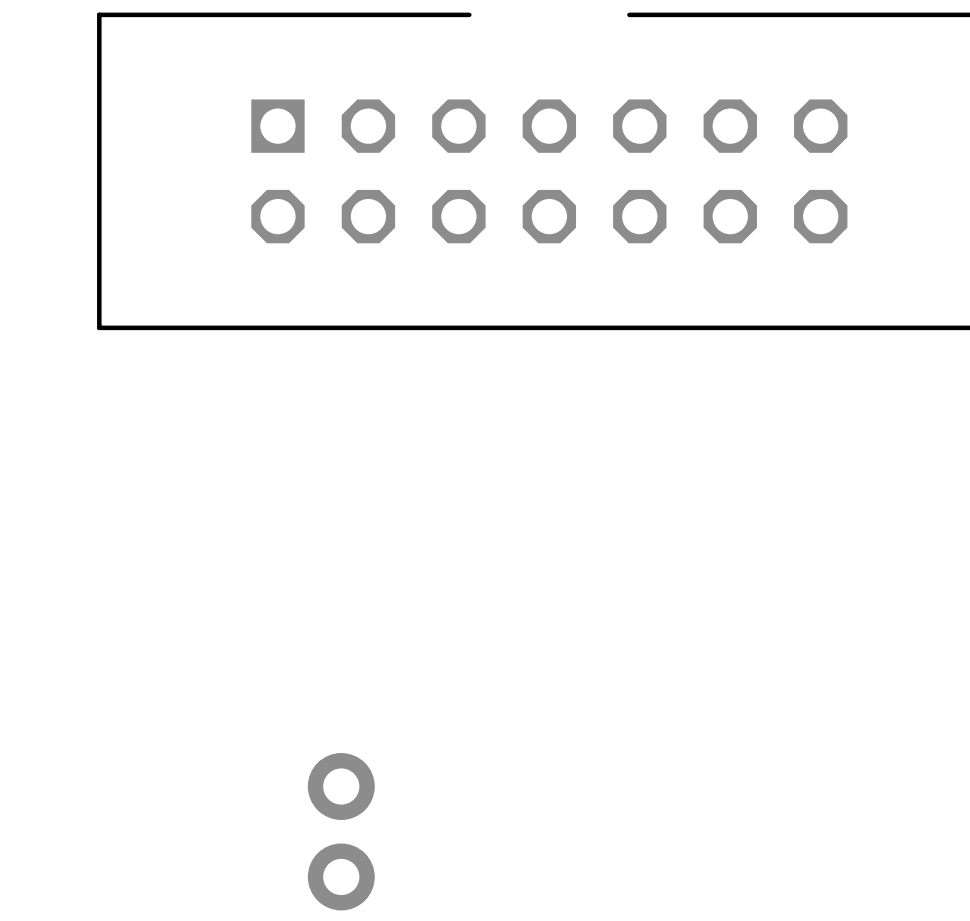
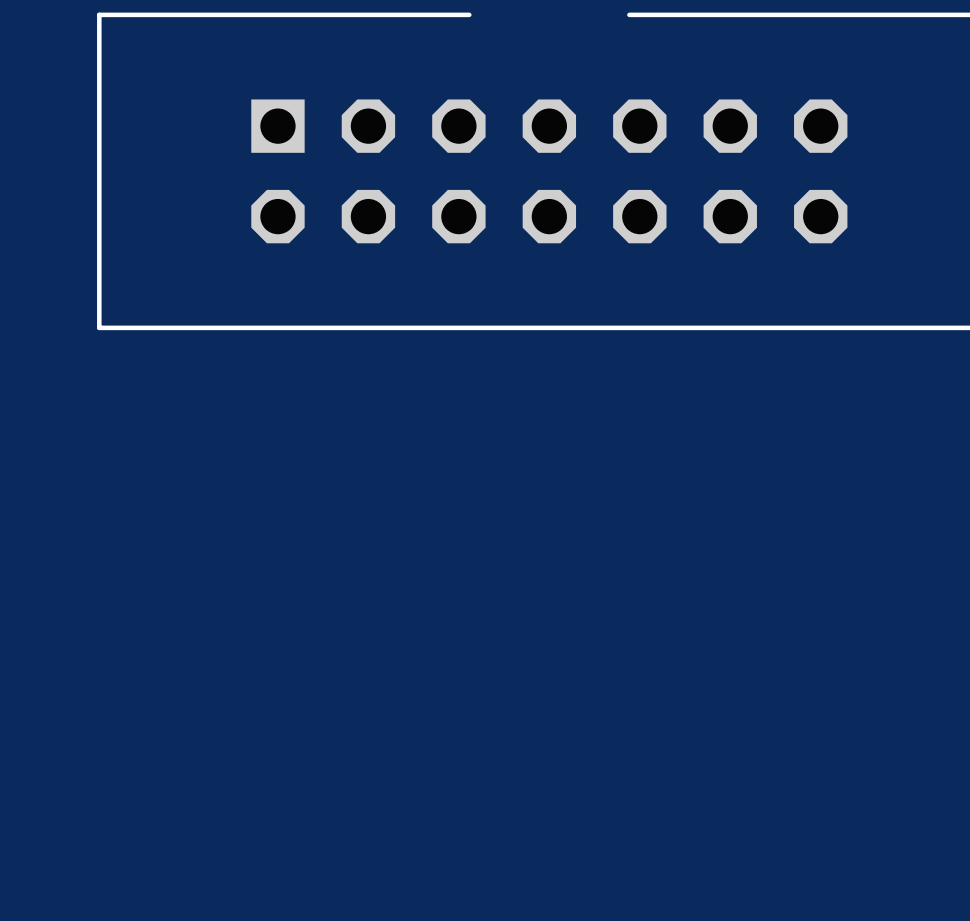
part: (341, 831) -> none

